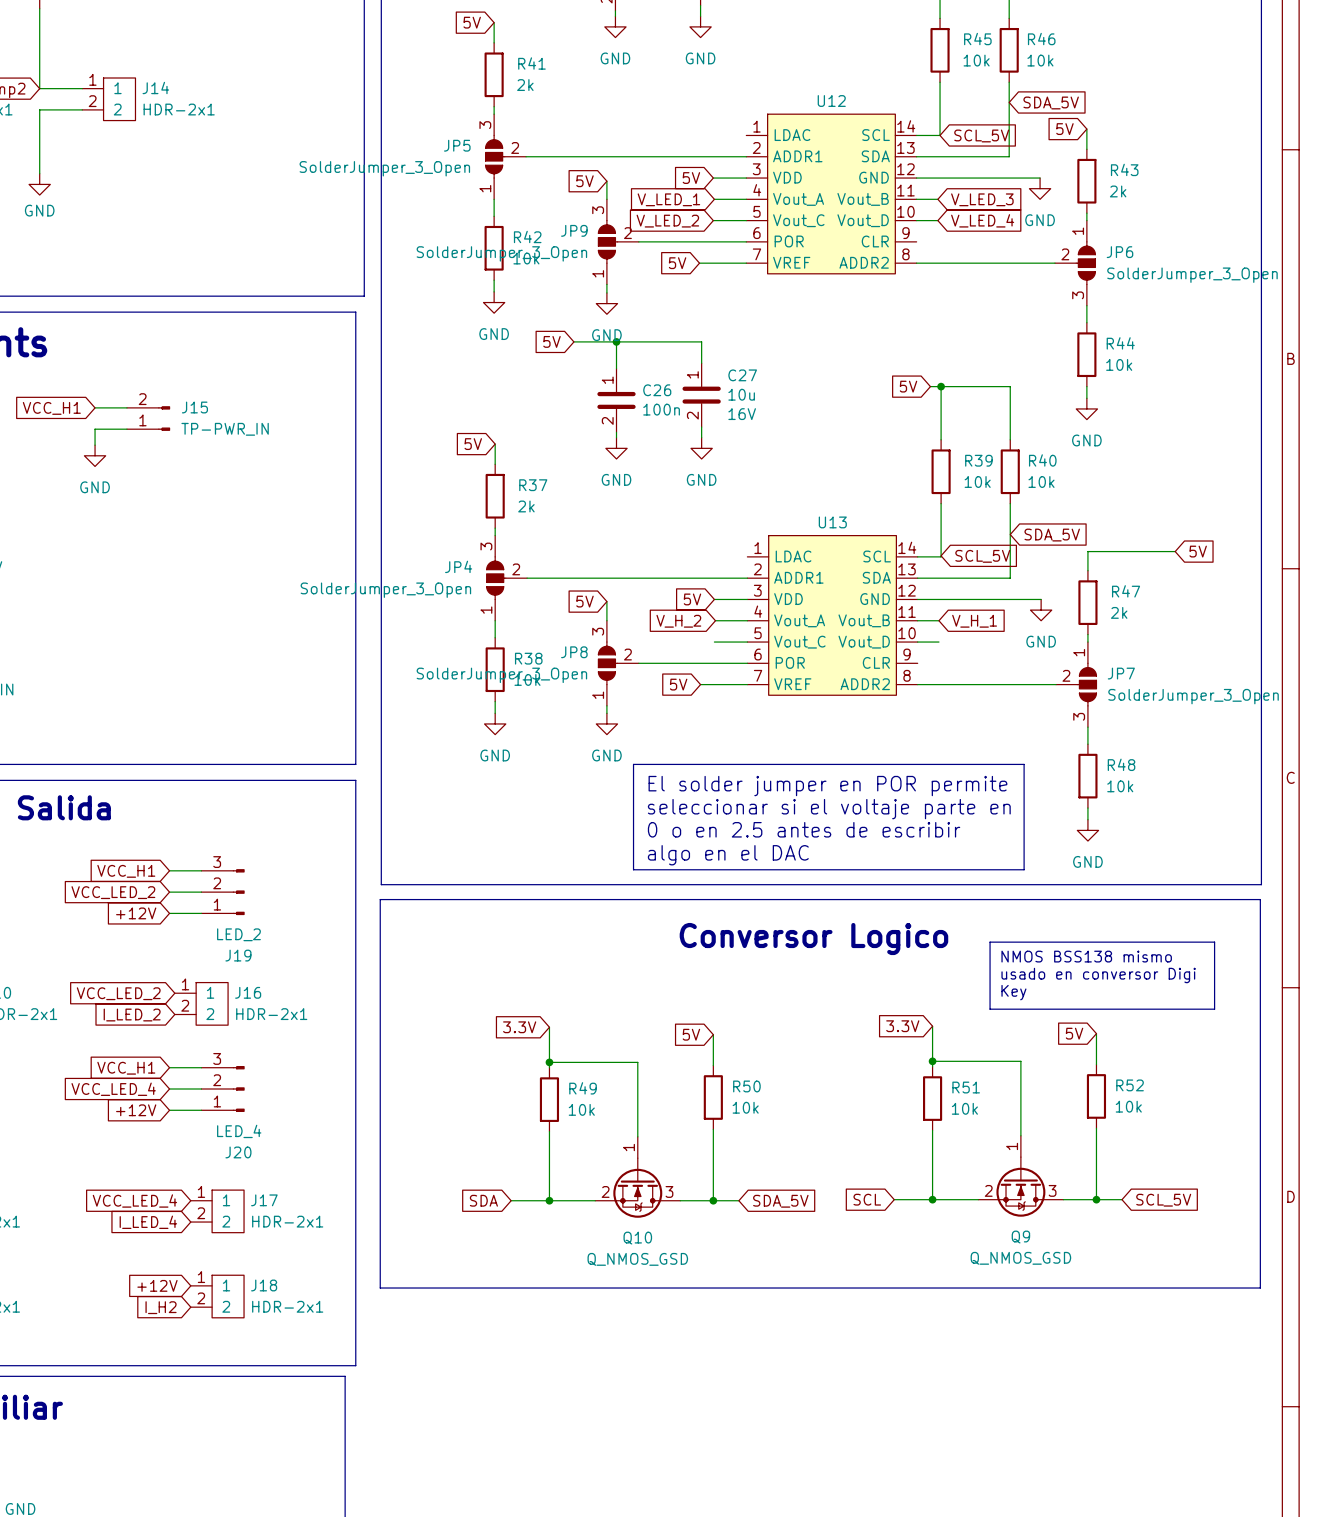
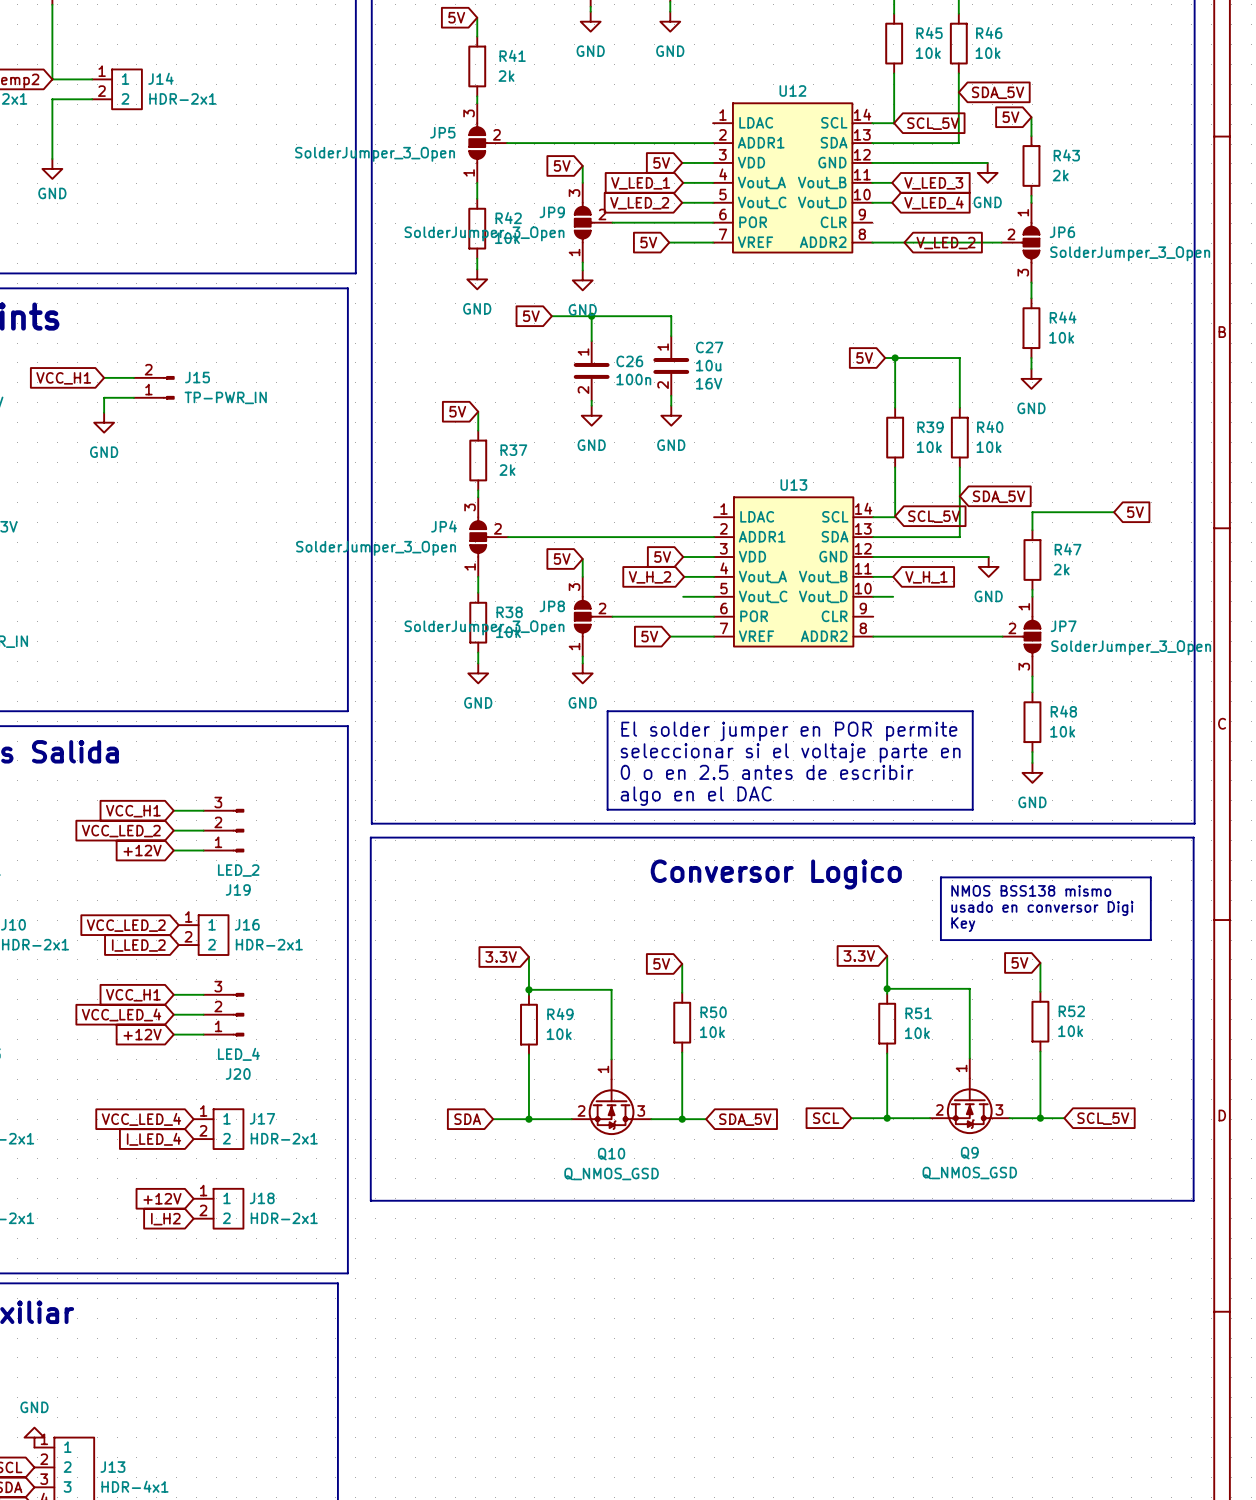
global label: none -> V_LED_2 (945, 243)

